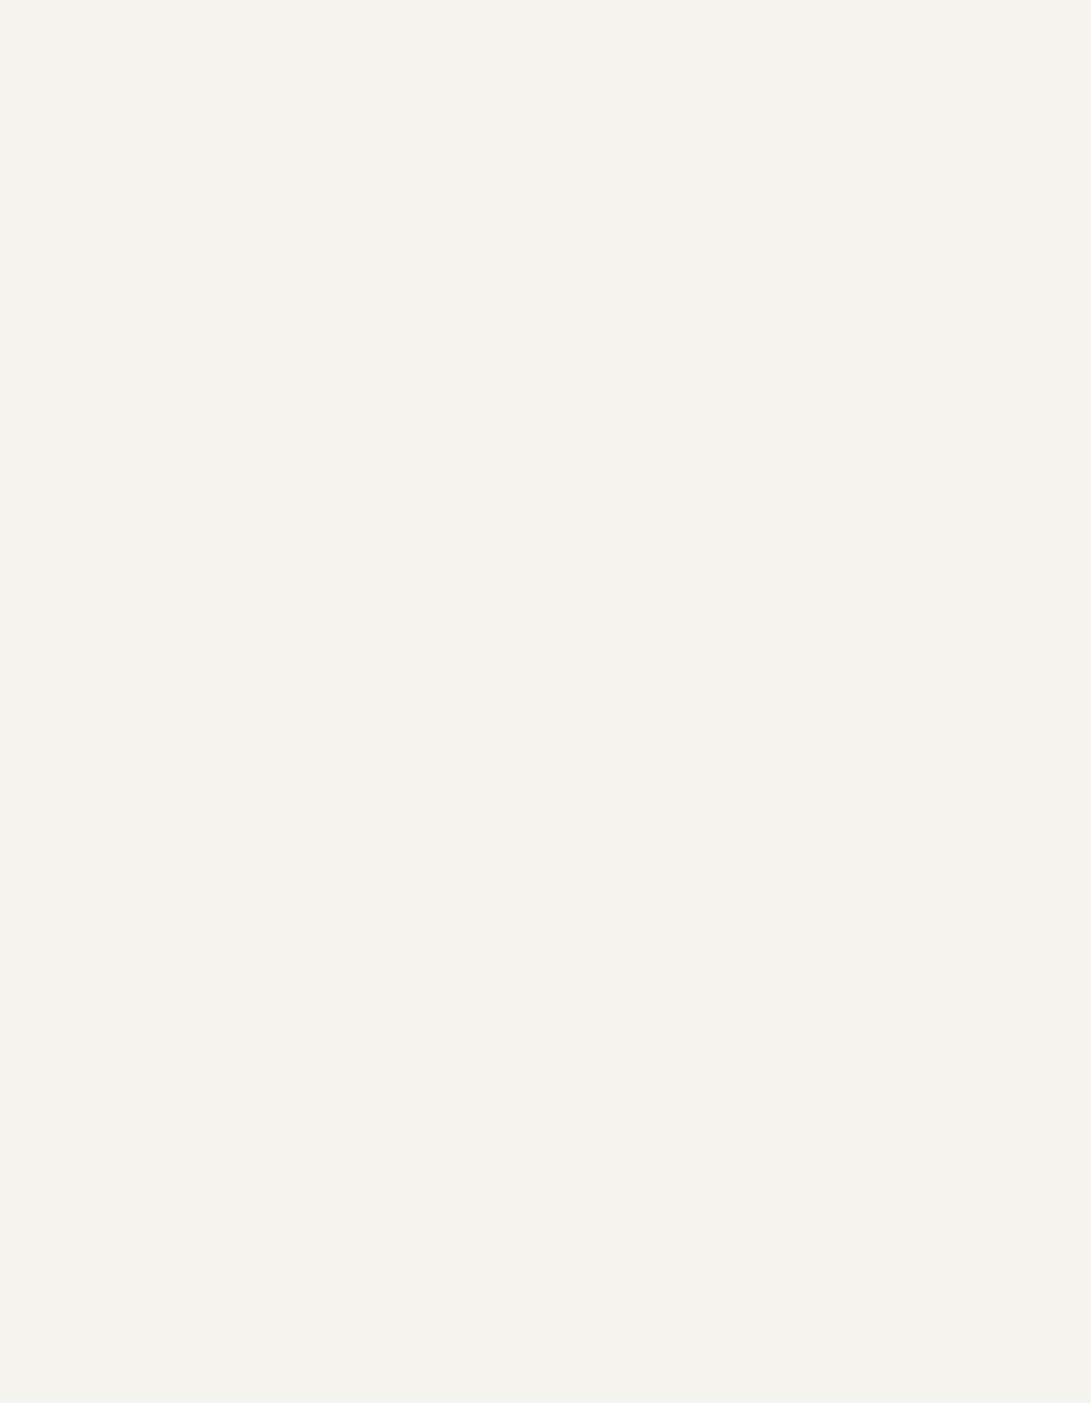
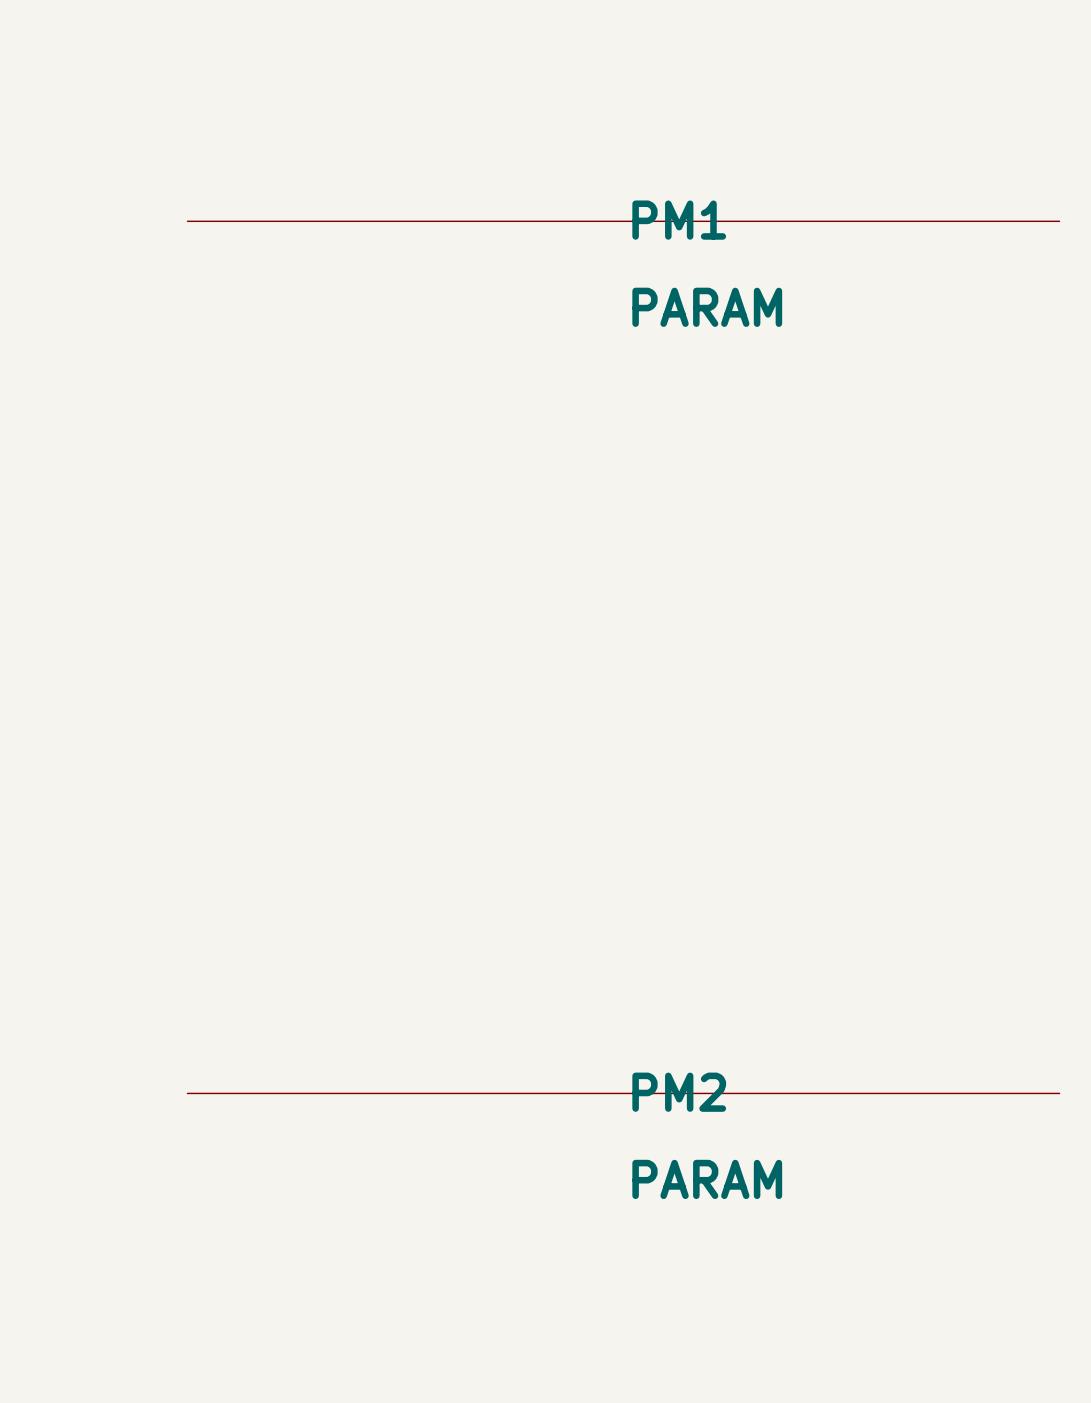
PM1: none -> PARAM (623, 221)
PM2: none -> PARAM (623, 1093)

